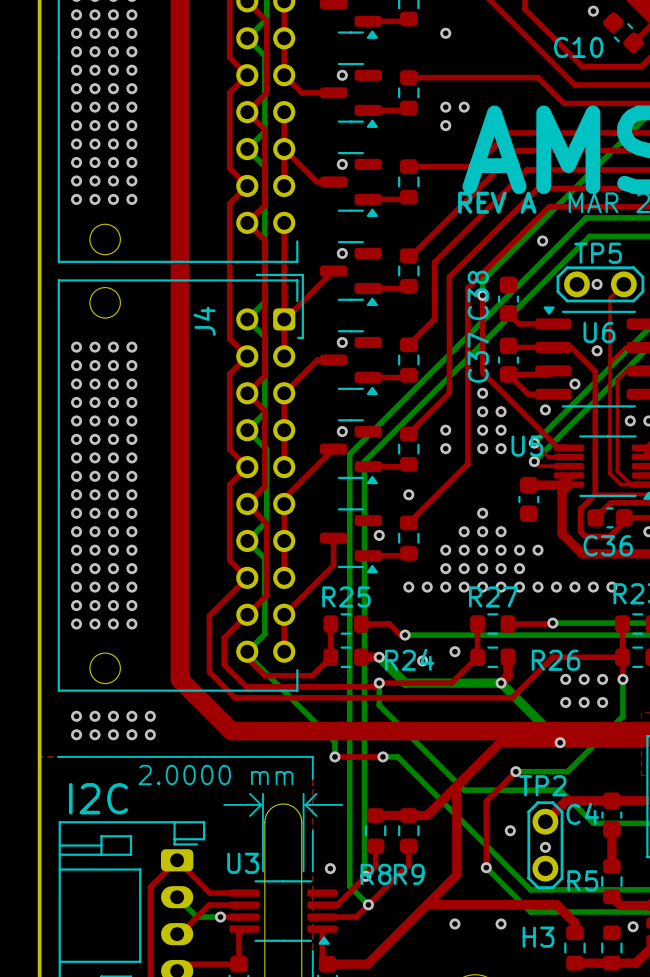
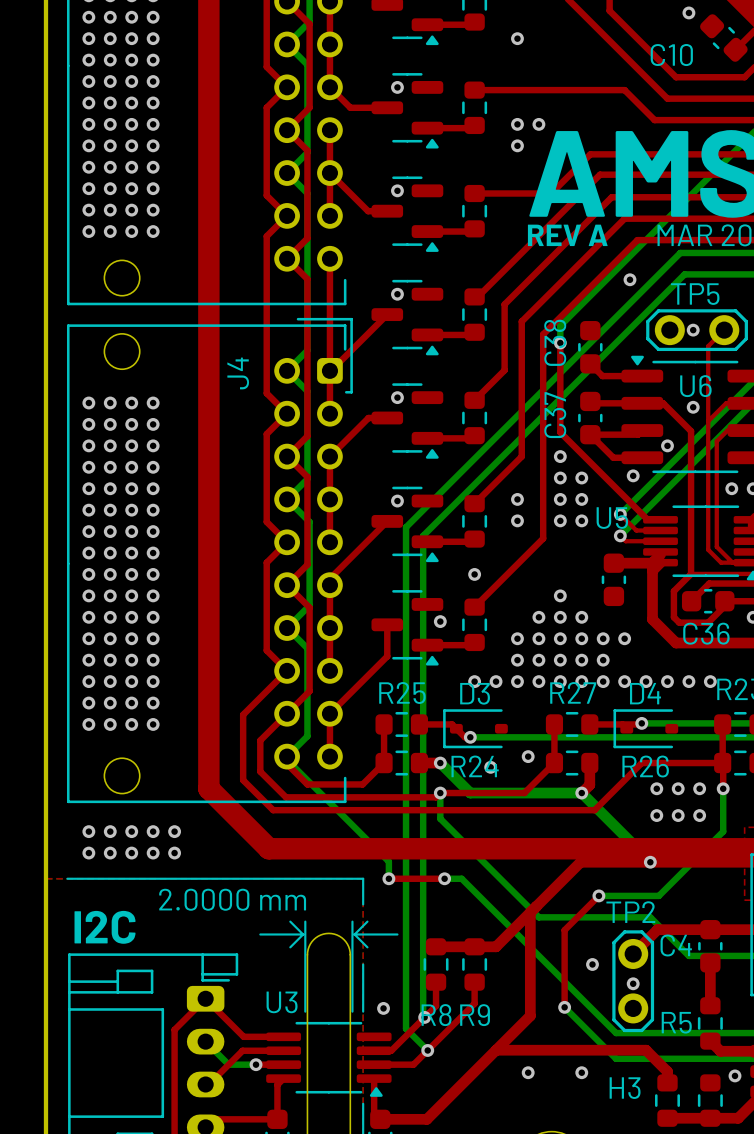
D3: none -> (475, 728)
D4: none -> (645, 728)

